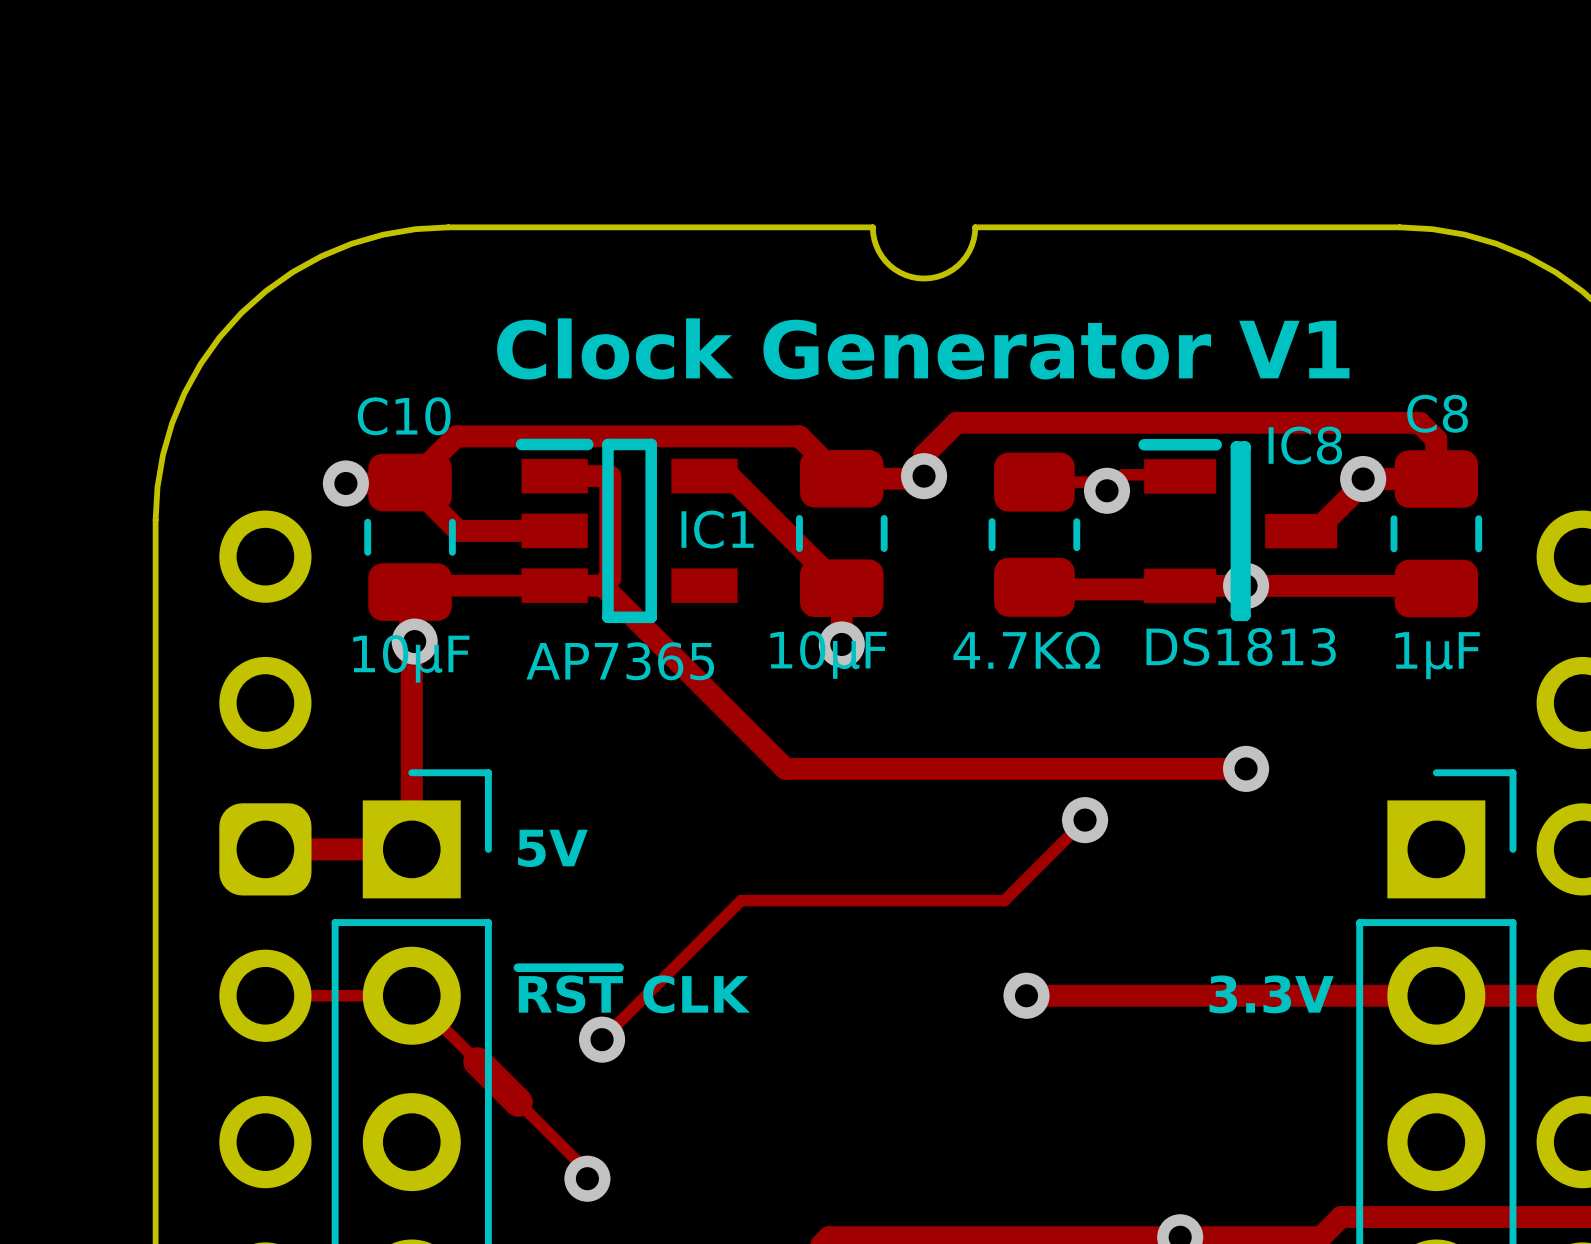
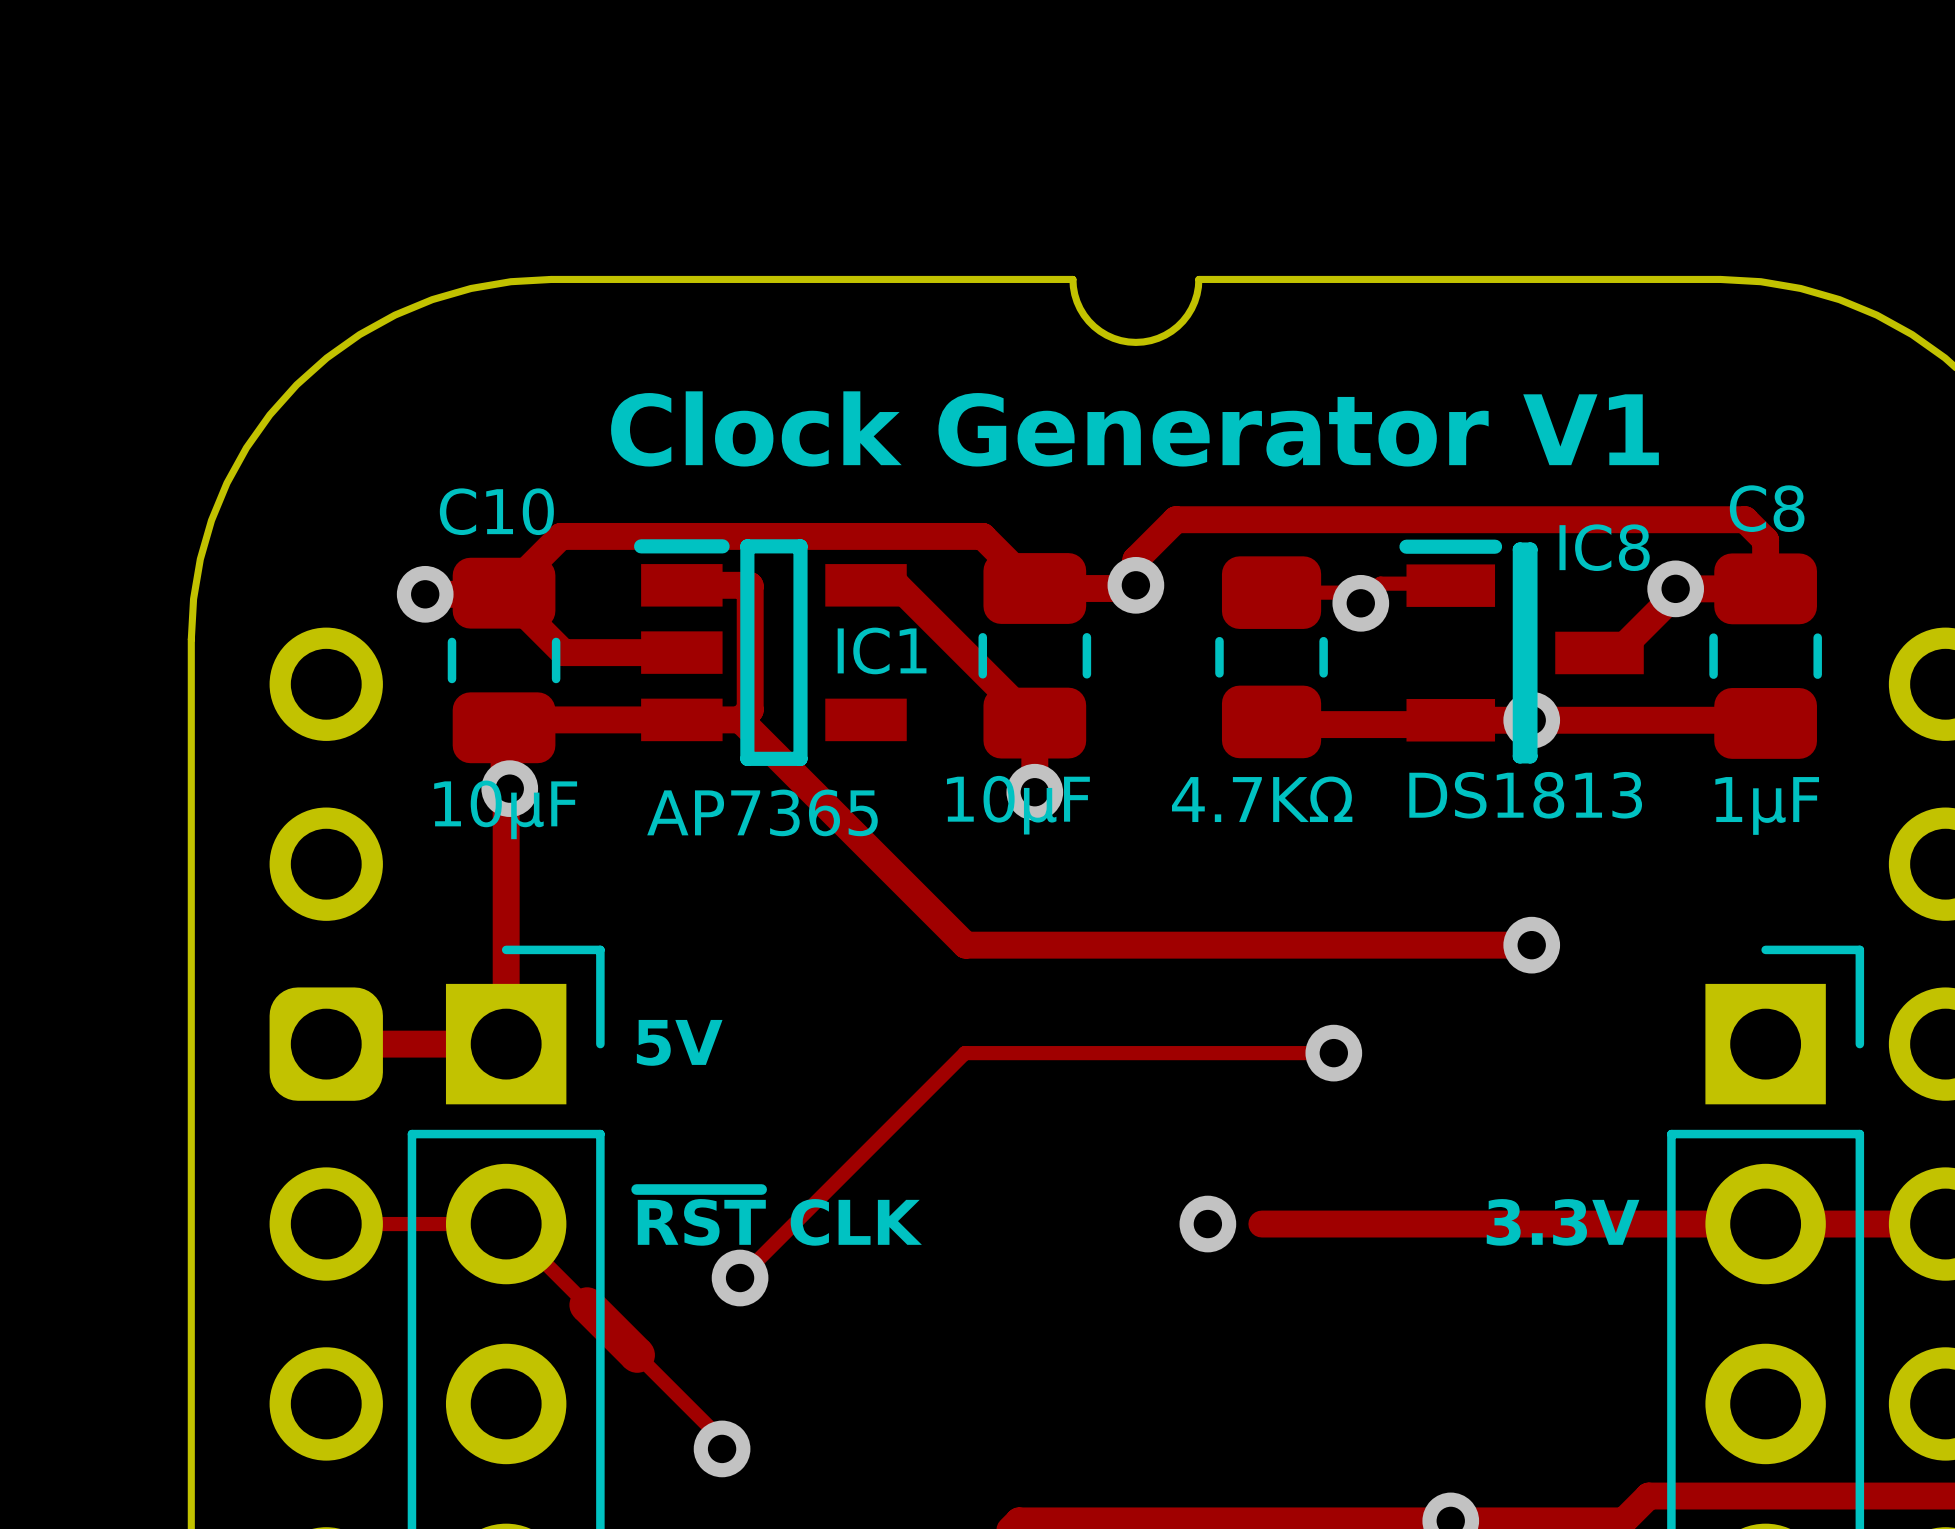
track: (1085, 820) (1004, 900) (741, 900) -> (1333, 1053) (964, 1053) (911, 1107)
via position: (1085, 820) -> (1333, 1053)
via position: (1026, 995) -> (1207, 1224)

